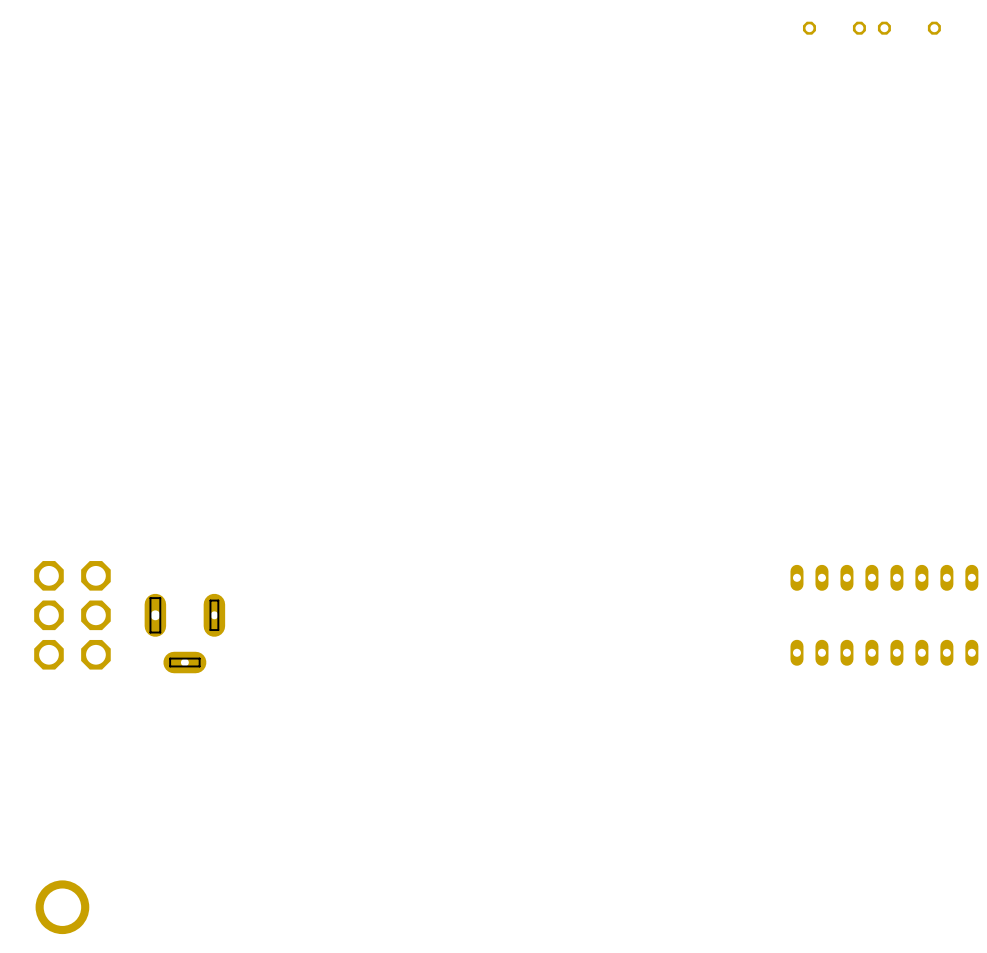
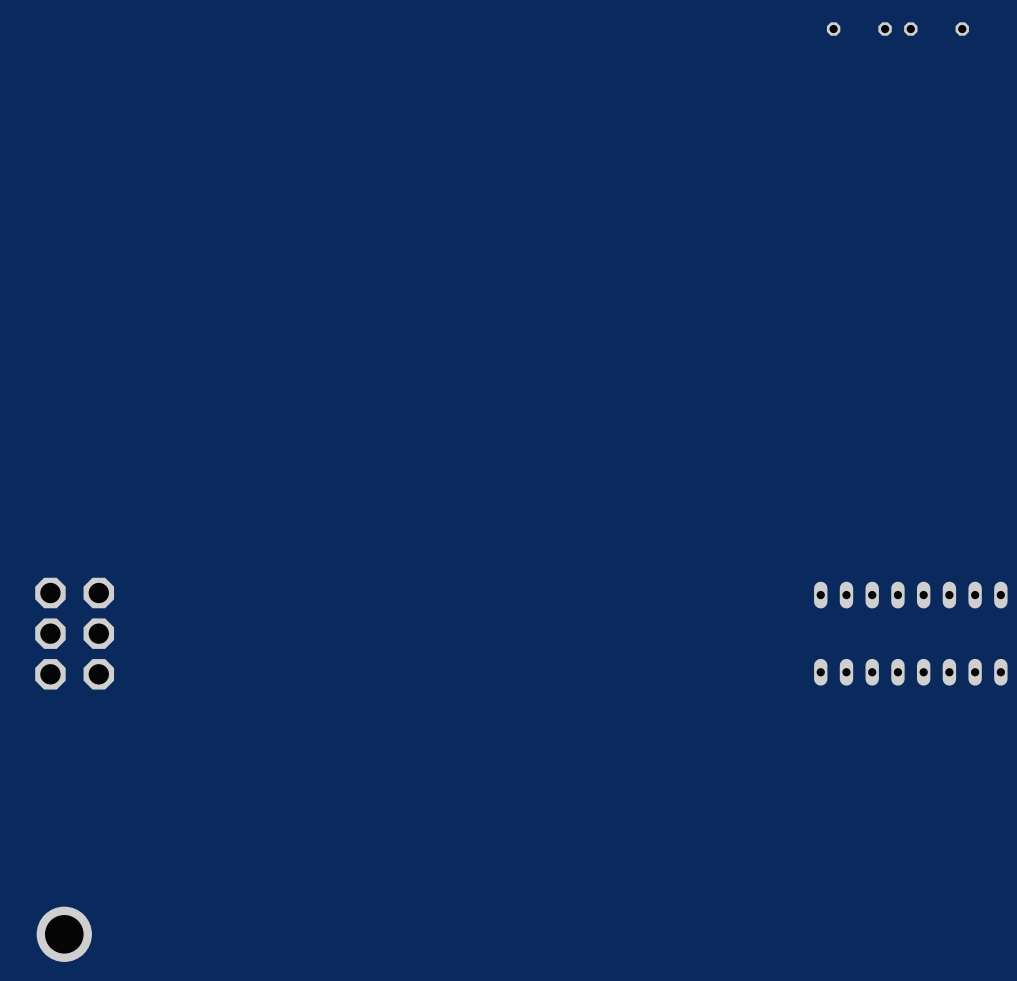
part: (184, 633) -> none

